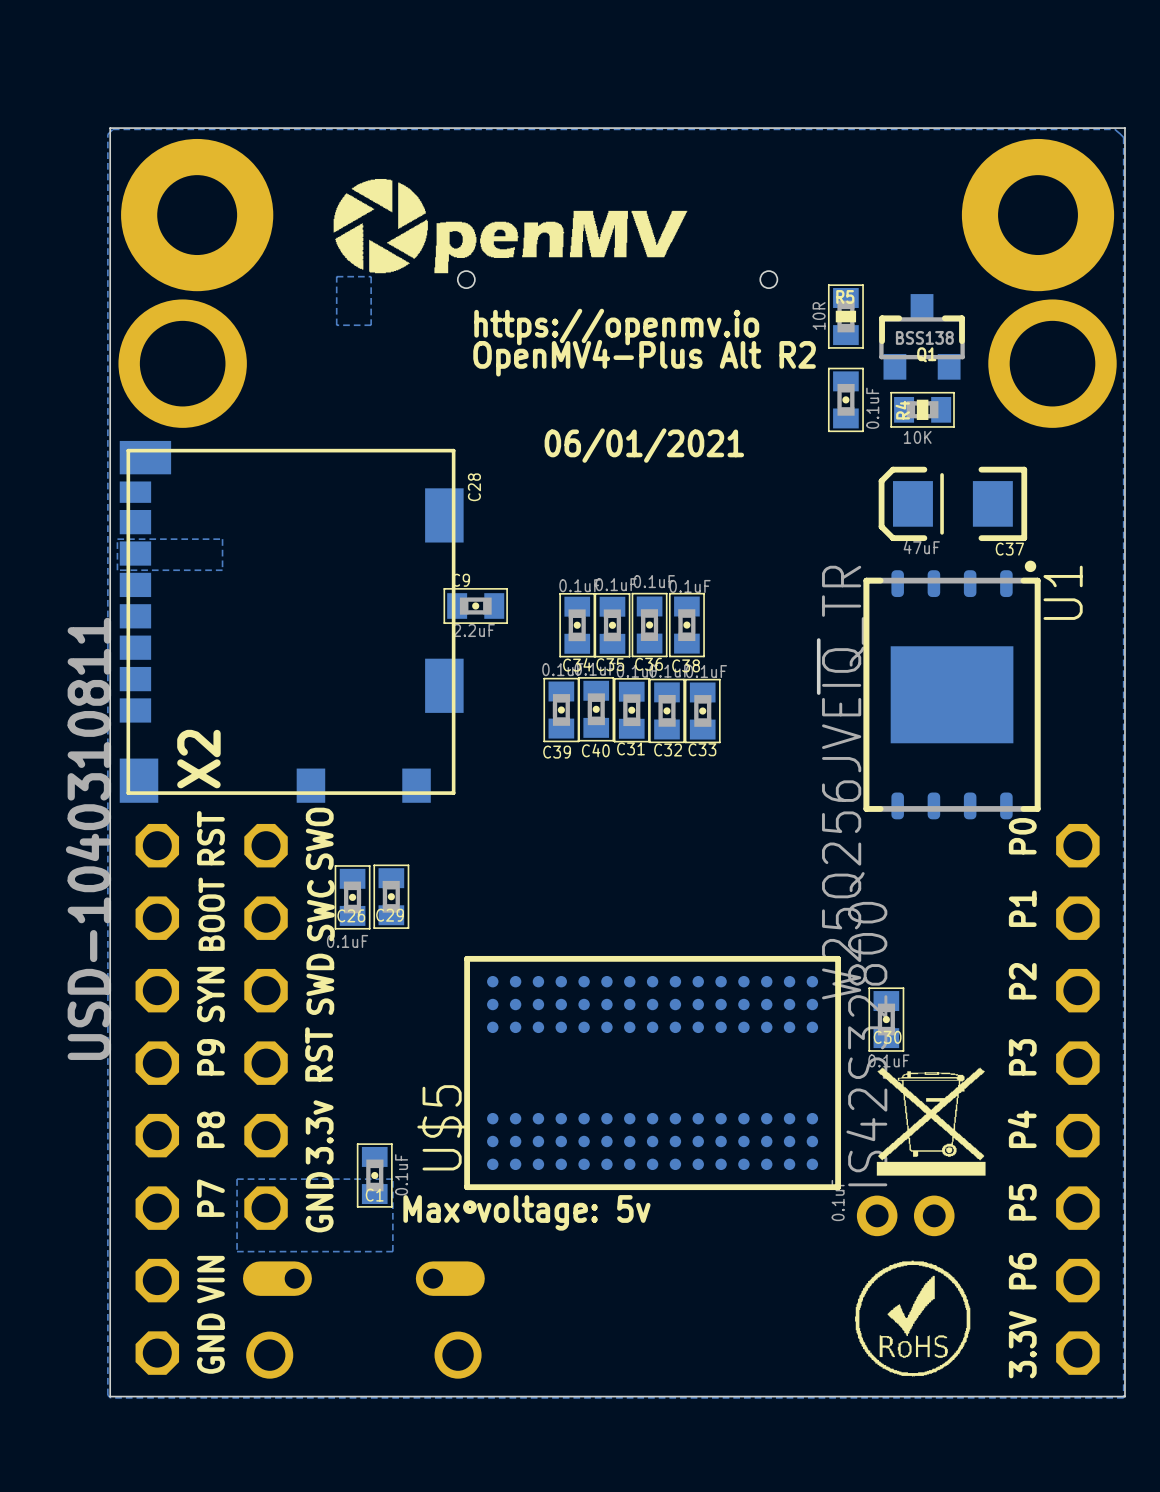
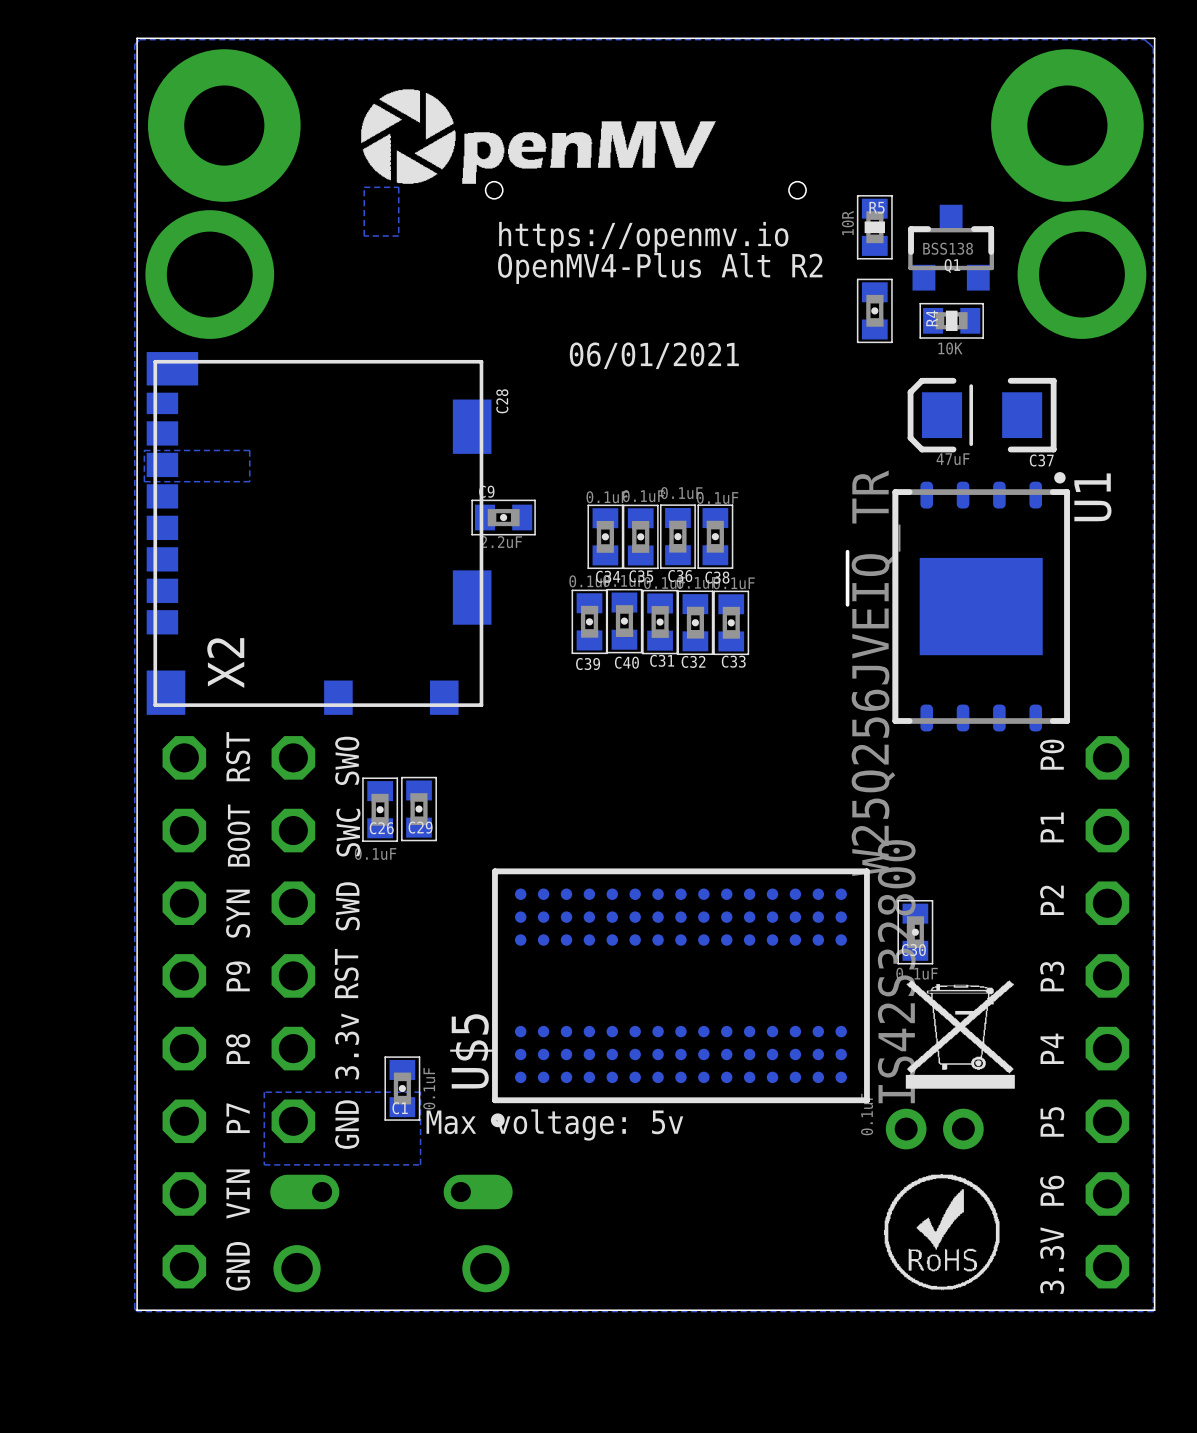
C28 value: 0.1uF (872, 408) -> none
X2 value: USD-1040310811 (88, 838) -> none

